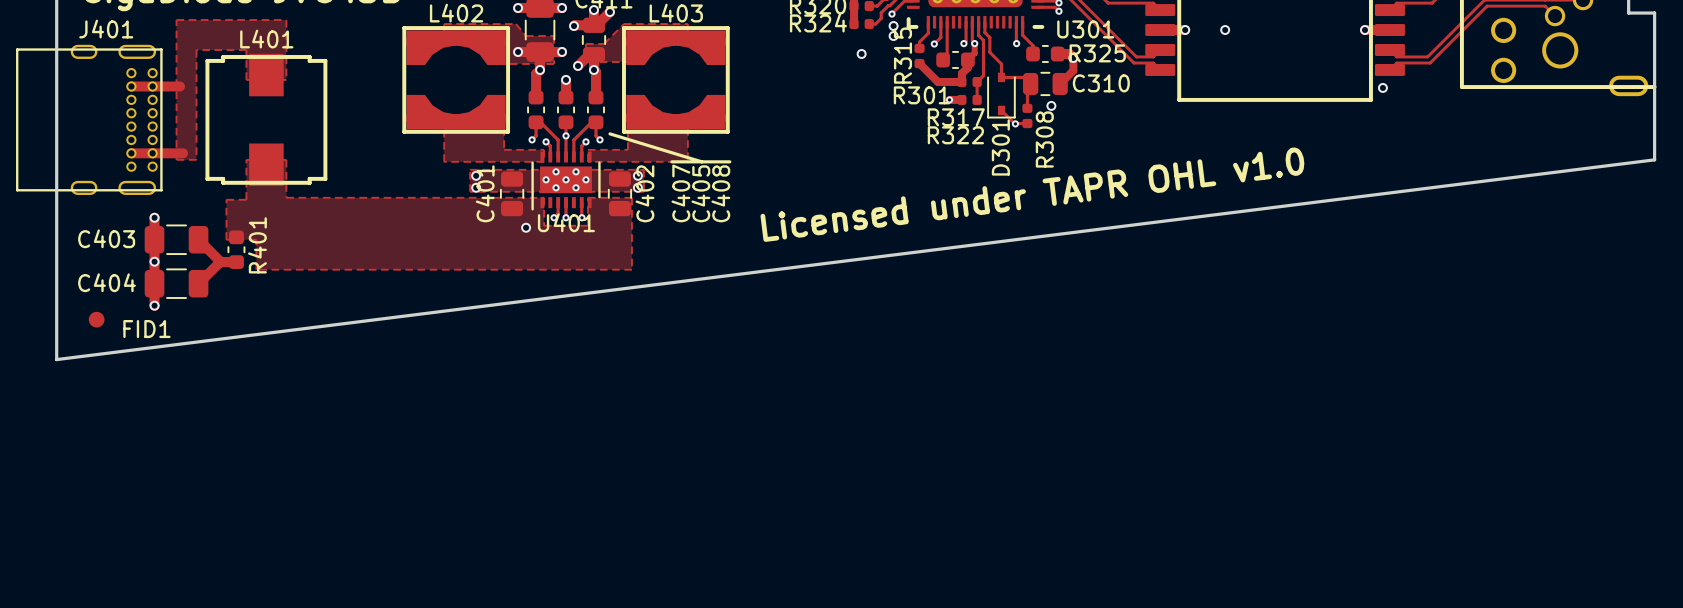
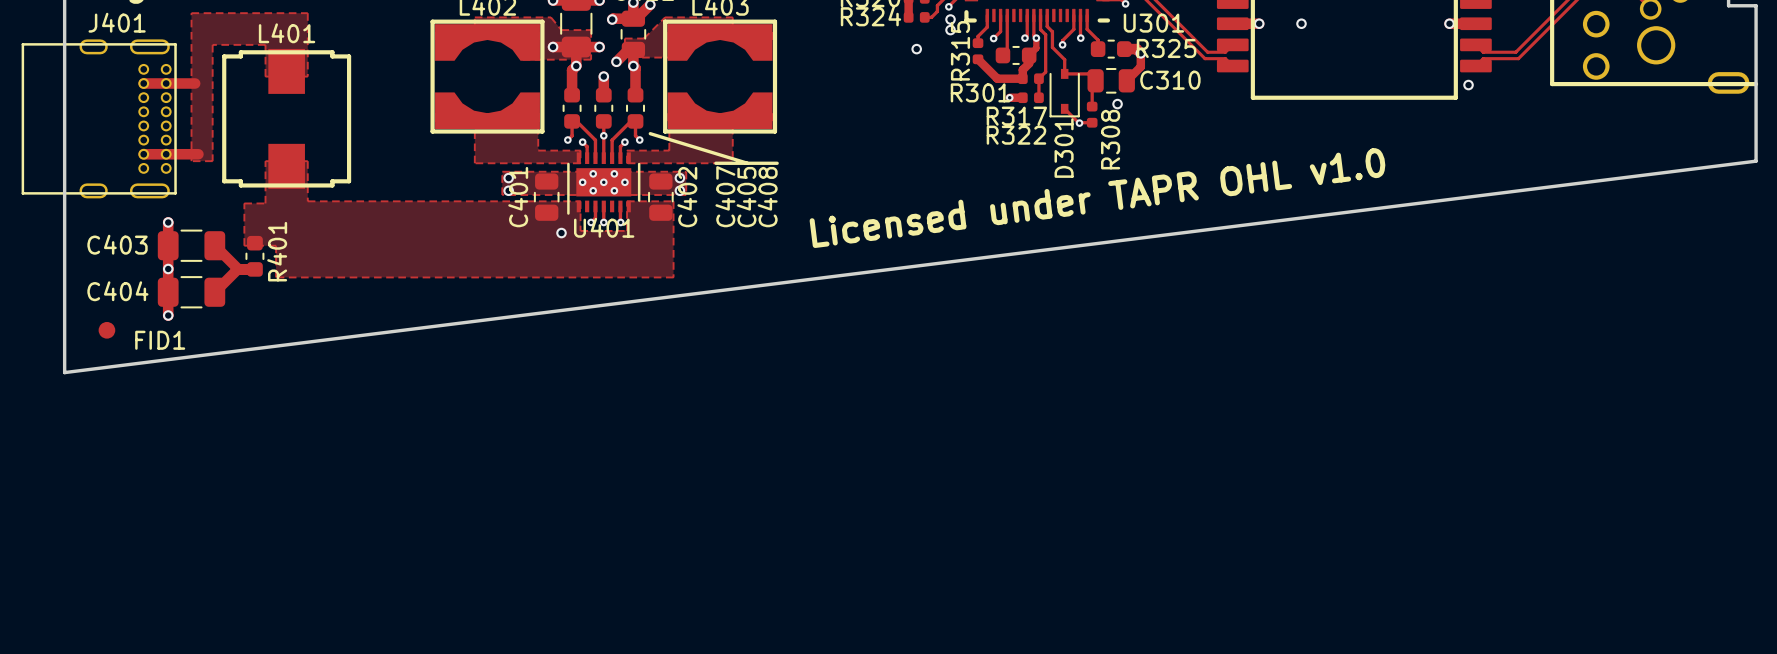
track: none -> (1073, 15) (1073, 29) (1062, 40) (1062, 44)
via: none -> (1062, 44)

